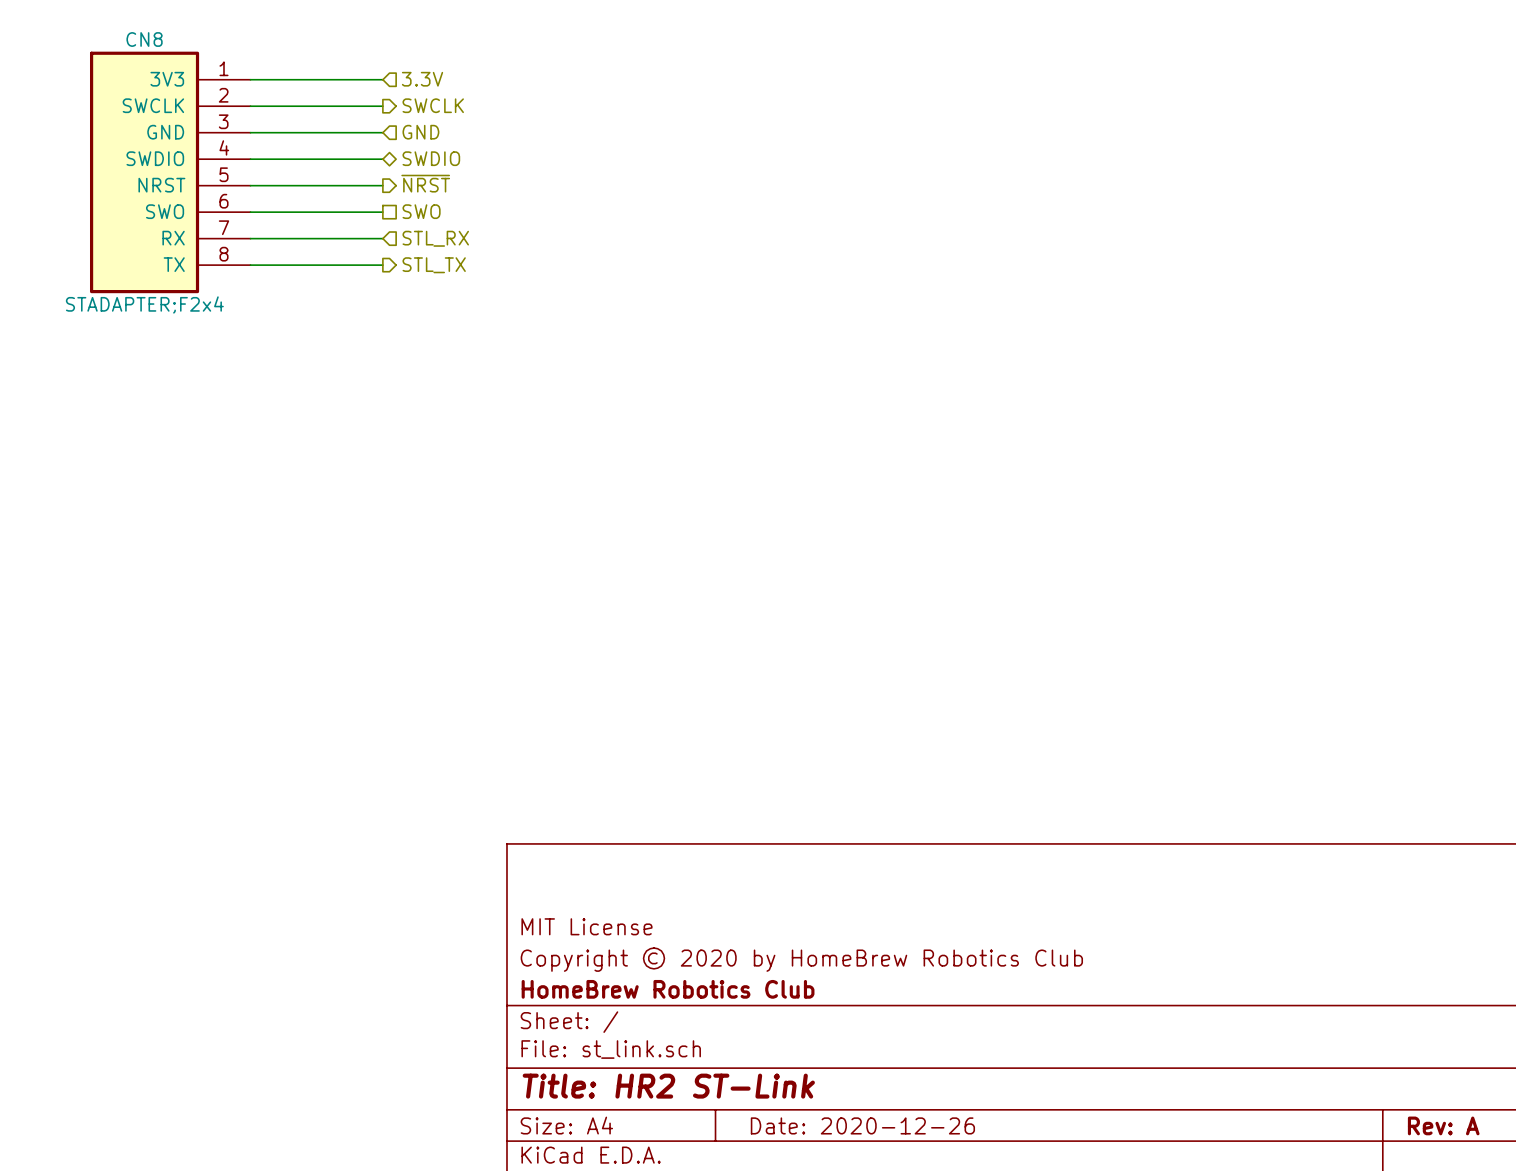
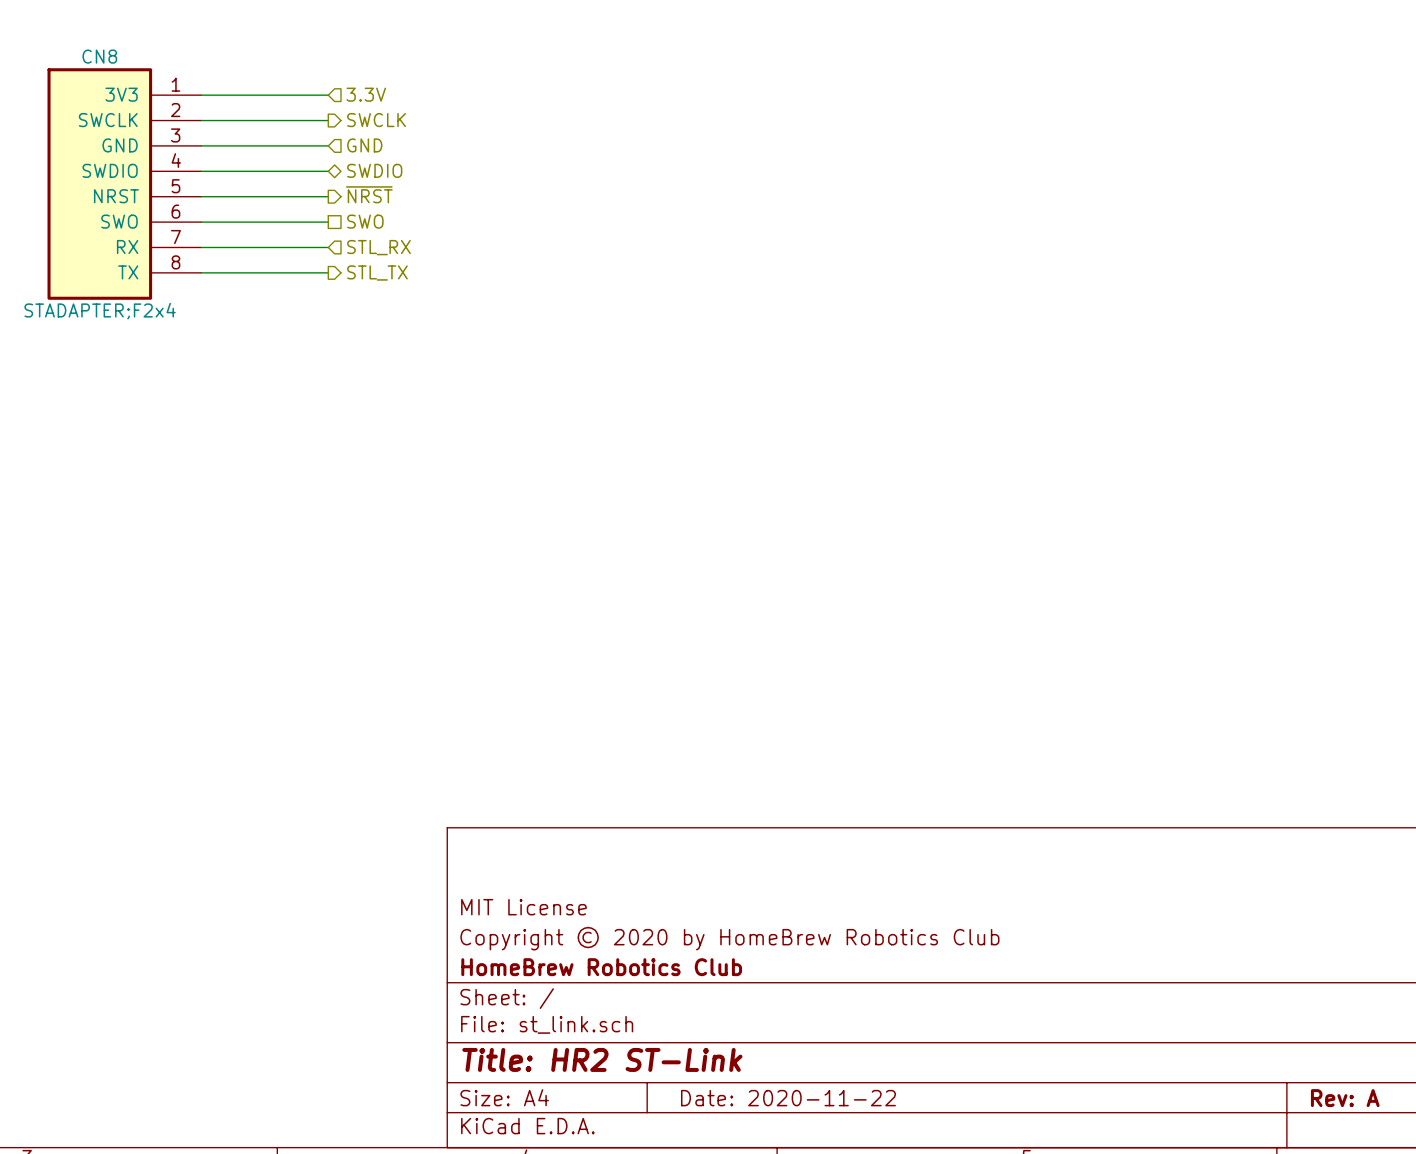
title block: Date: 2020-12-26 (862, 1125) -> Date: 2020-11-22 (788, 1098)

